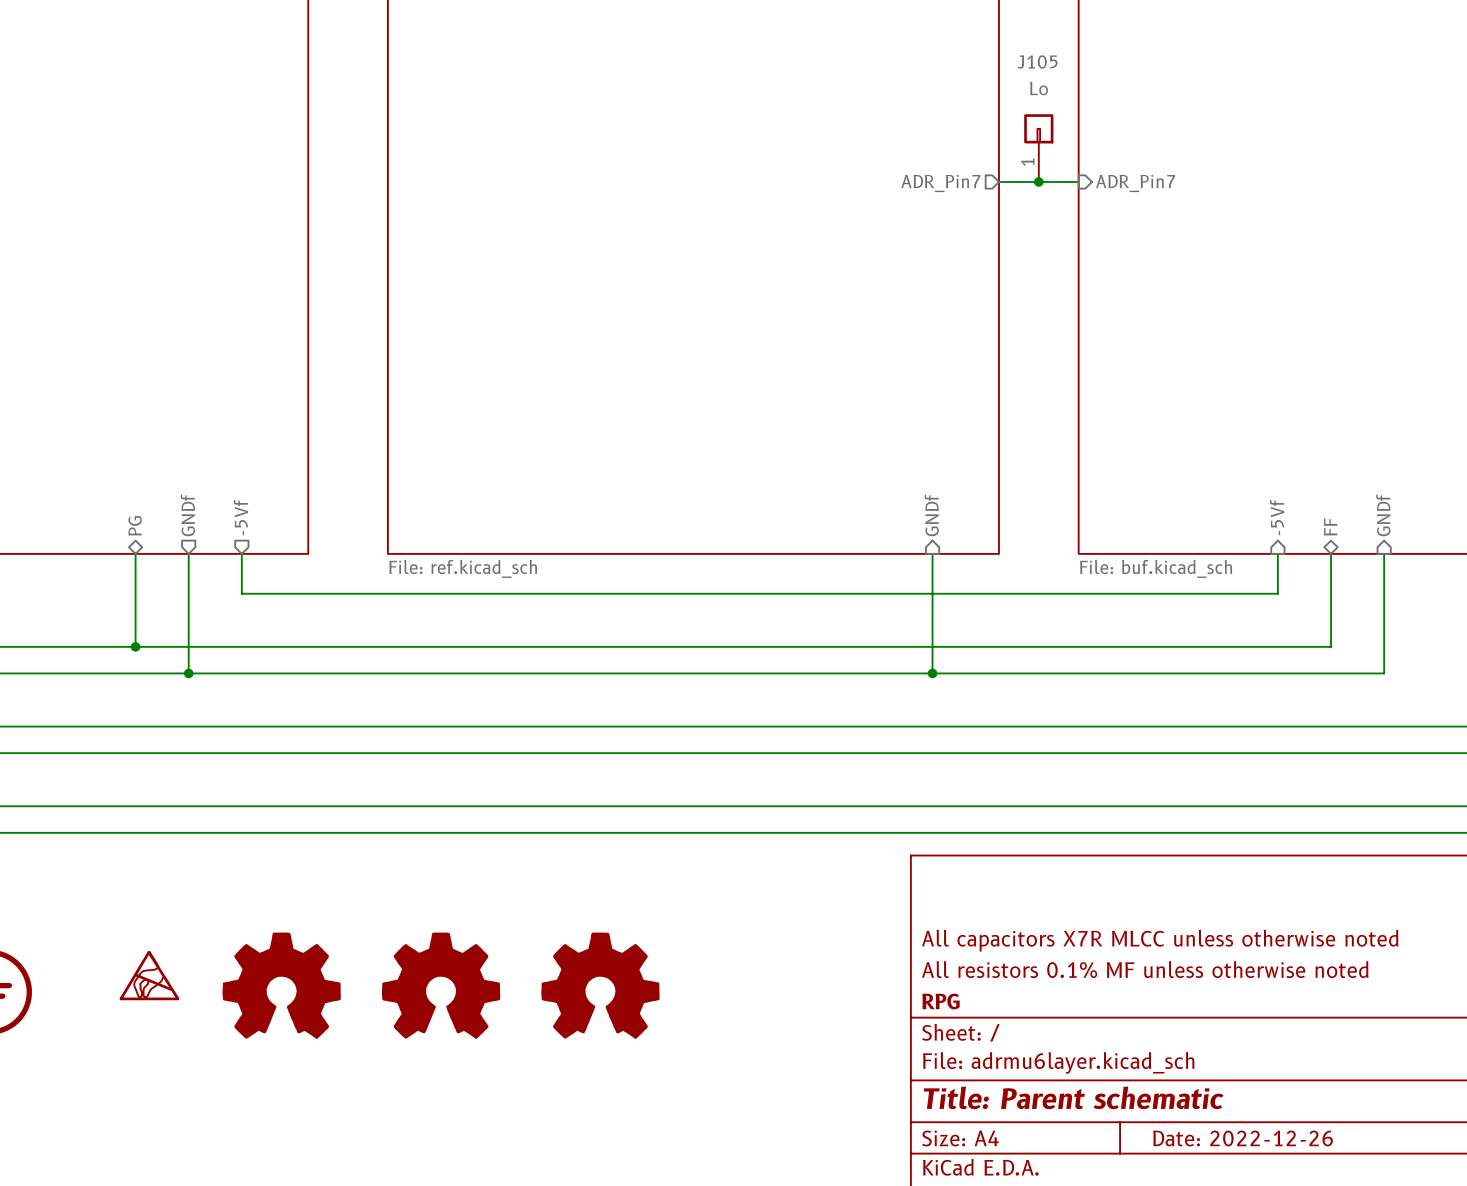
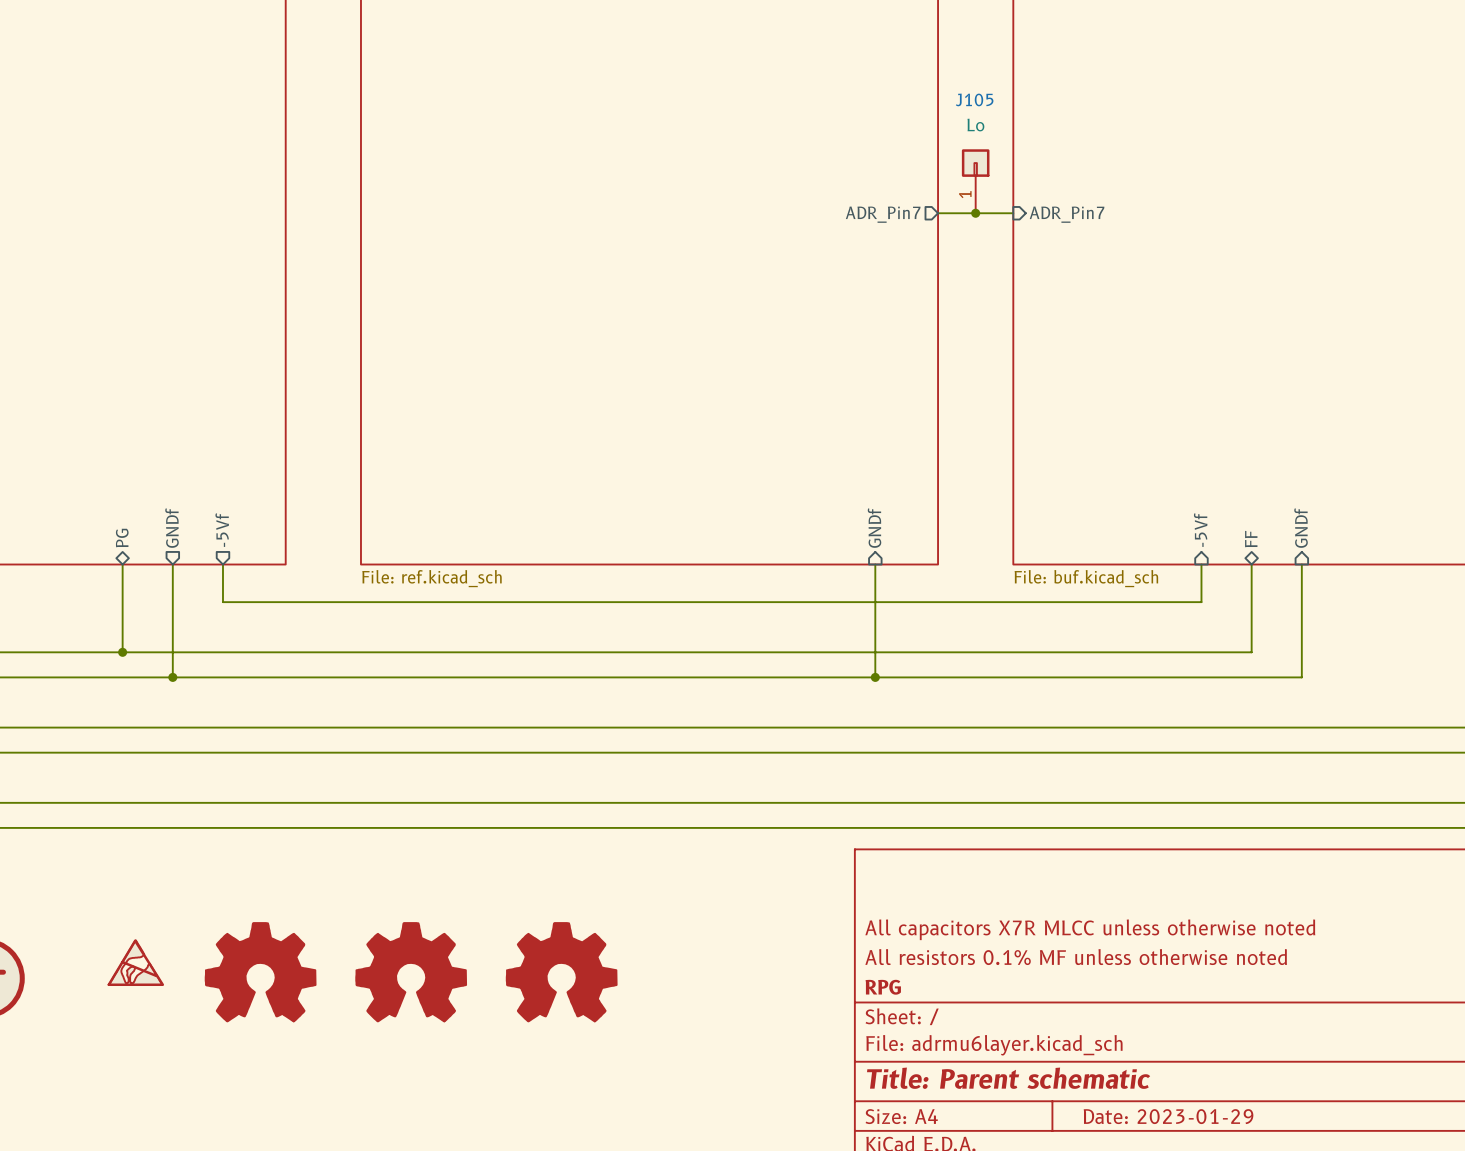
title block: Date: 2022-12-26 (1243, 1138) -> Date: 2023-01-29 (1168, 1116)

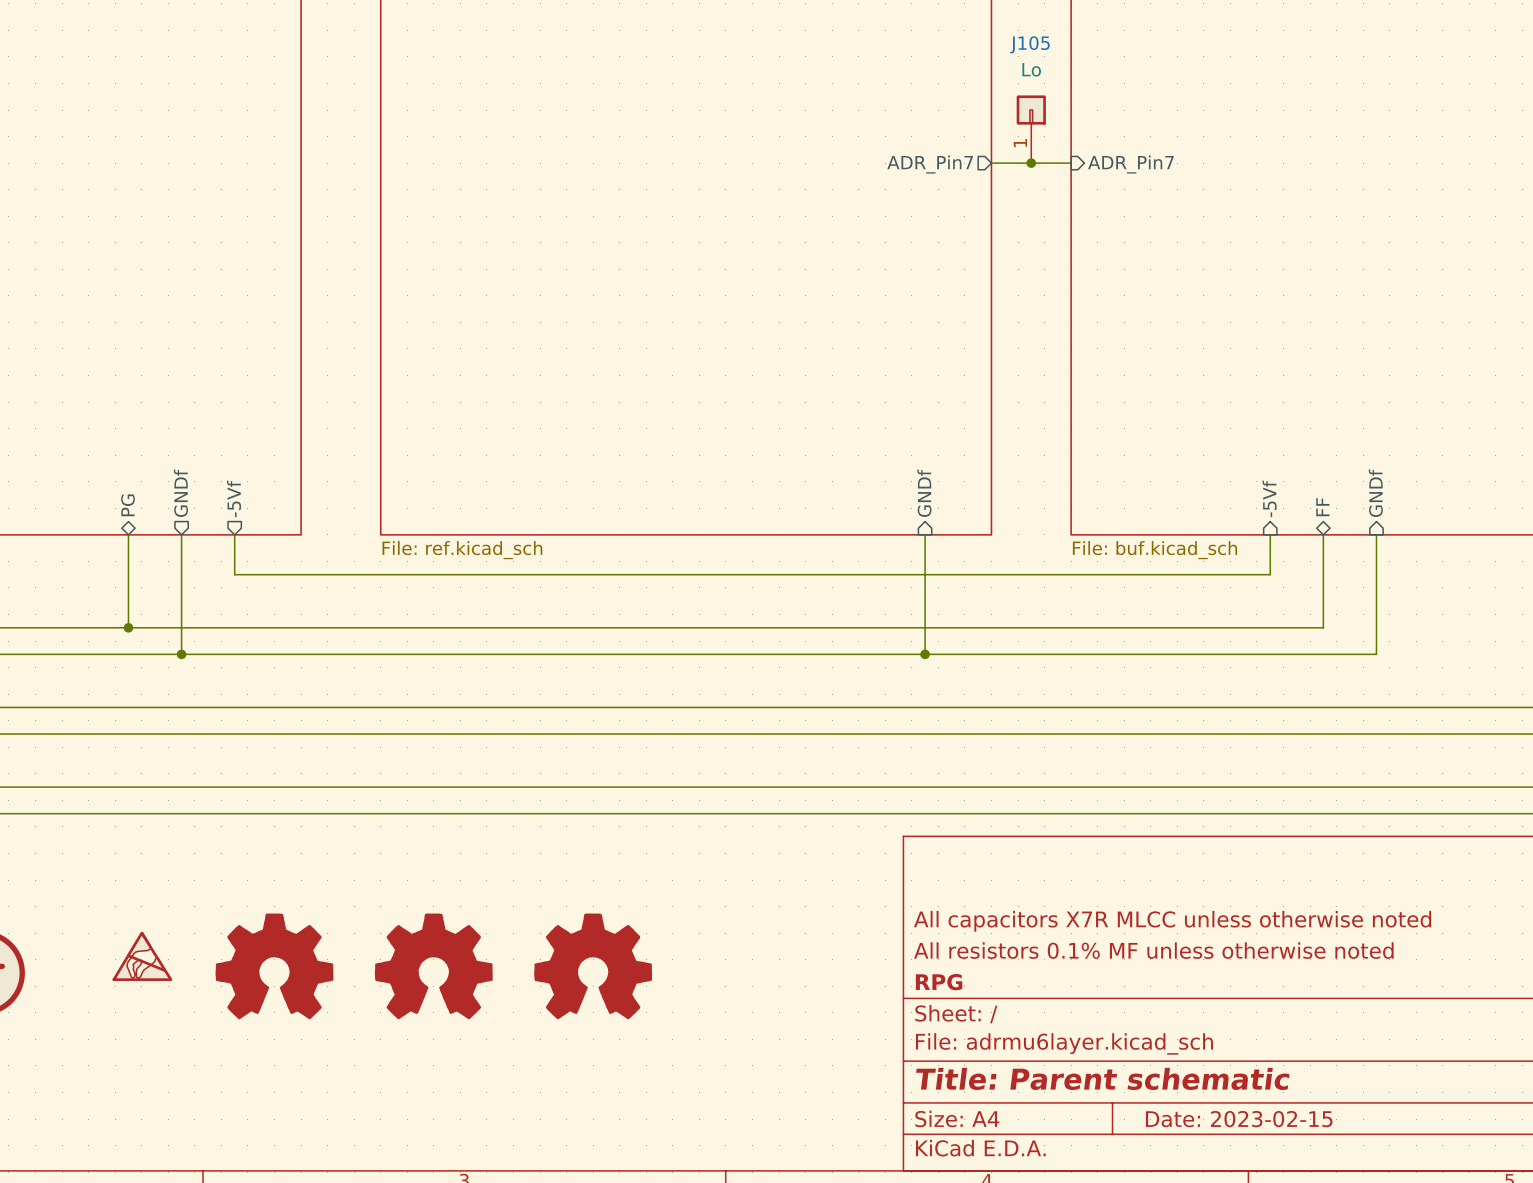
title block: Date: 2023-01-29 (1168, 1116) -> Date: 2023-02-15 (1239, 1119)

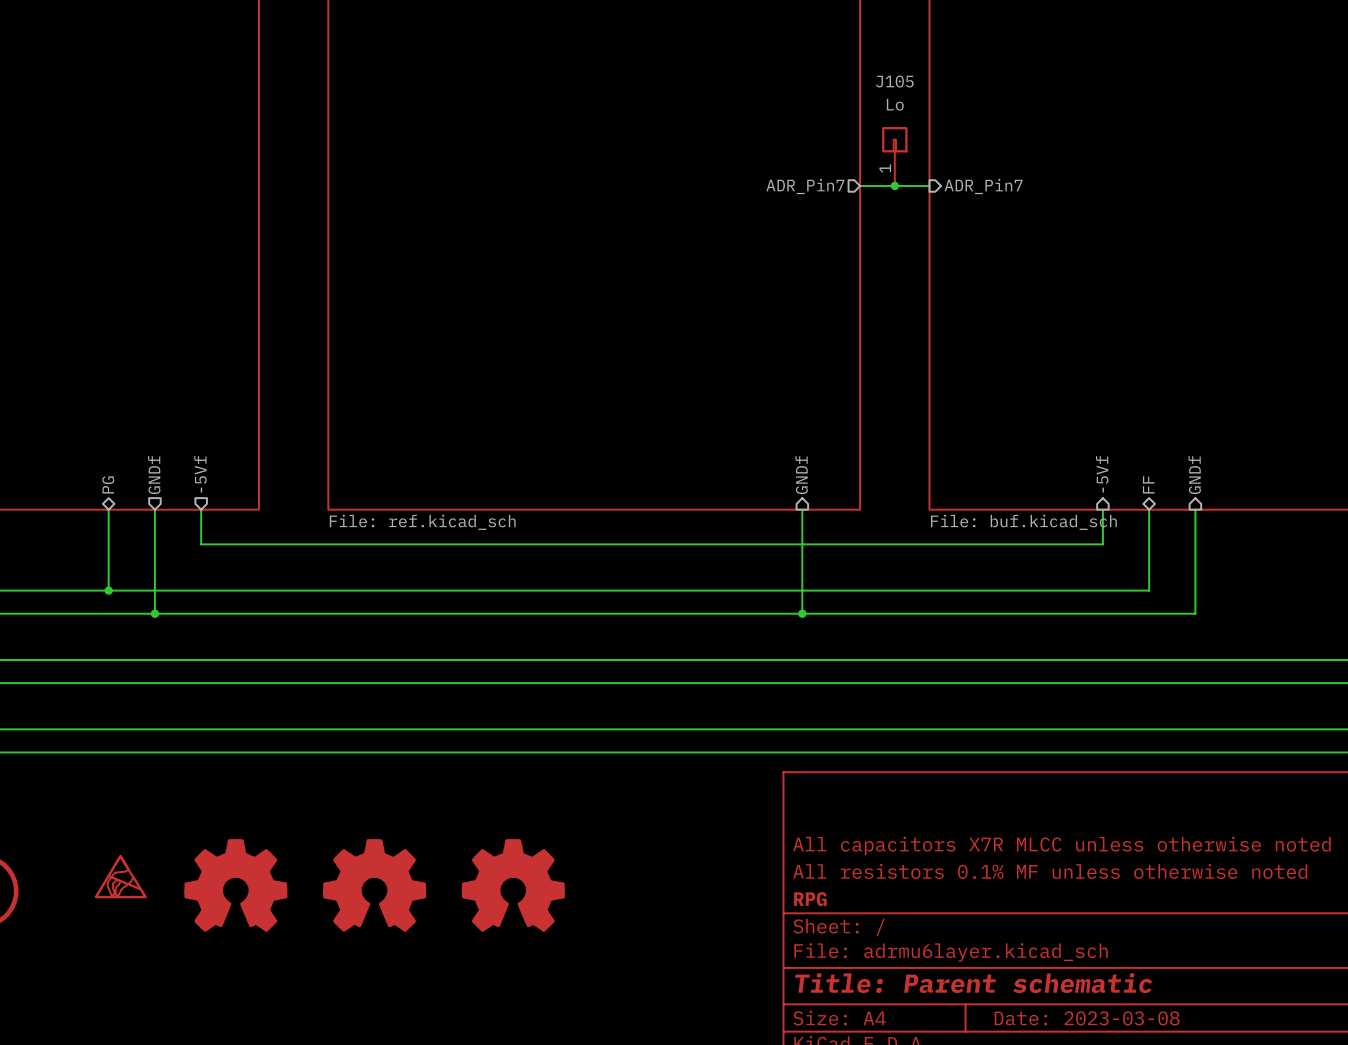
title block: Date: 2023-02-15 (1239, 1119) -> Date: 2023-03-08 (1087, 1018)

